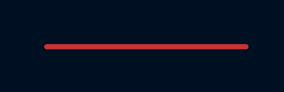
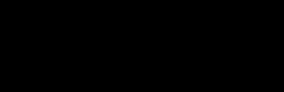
track: (46, 46) (245, 46) -> none

